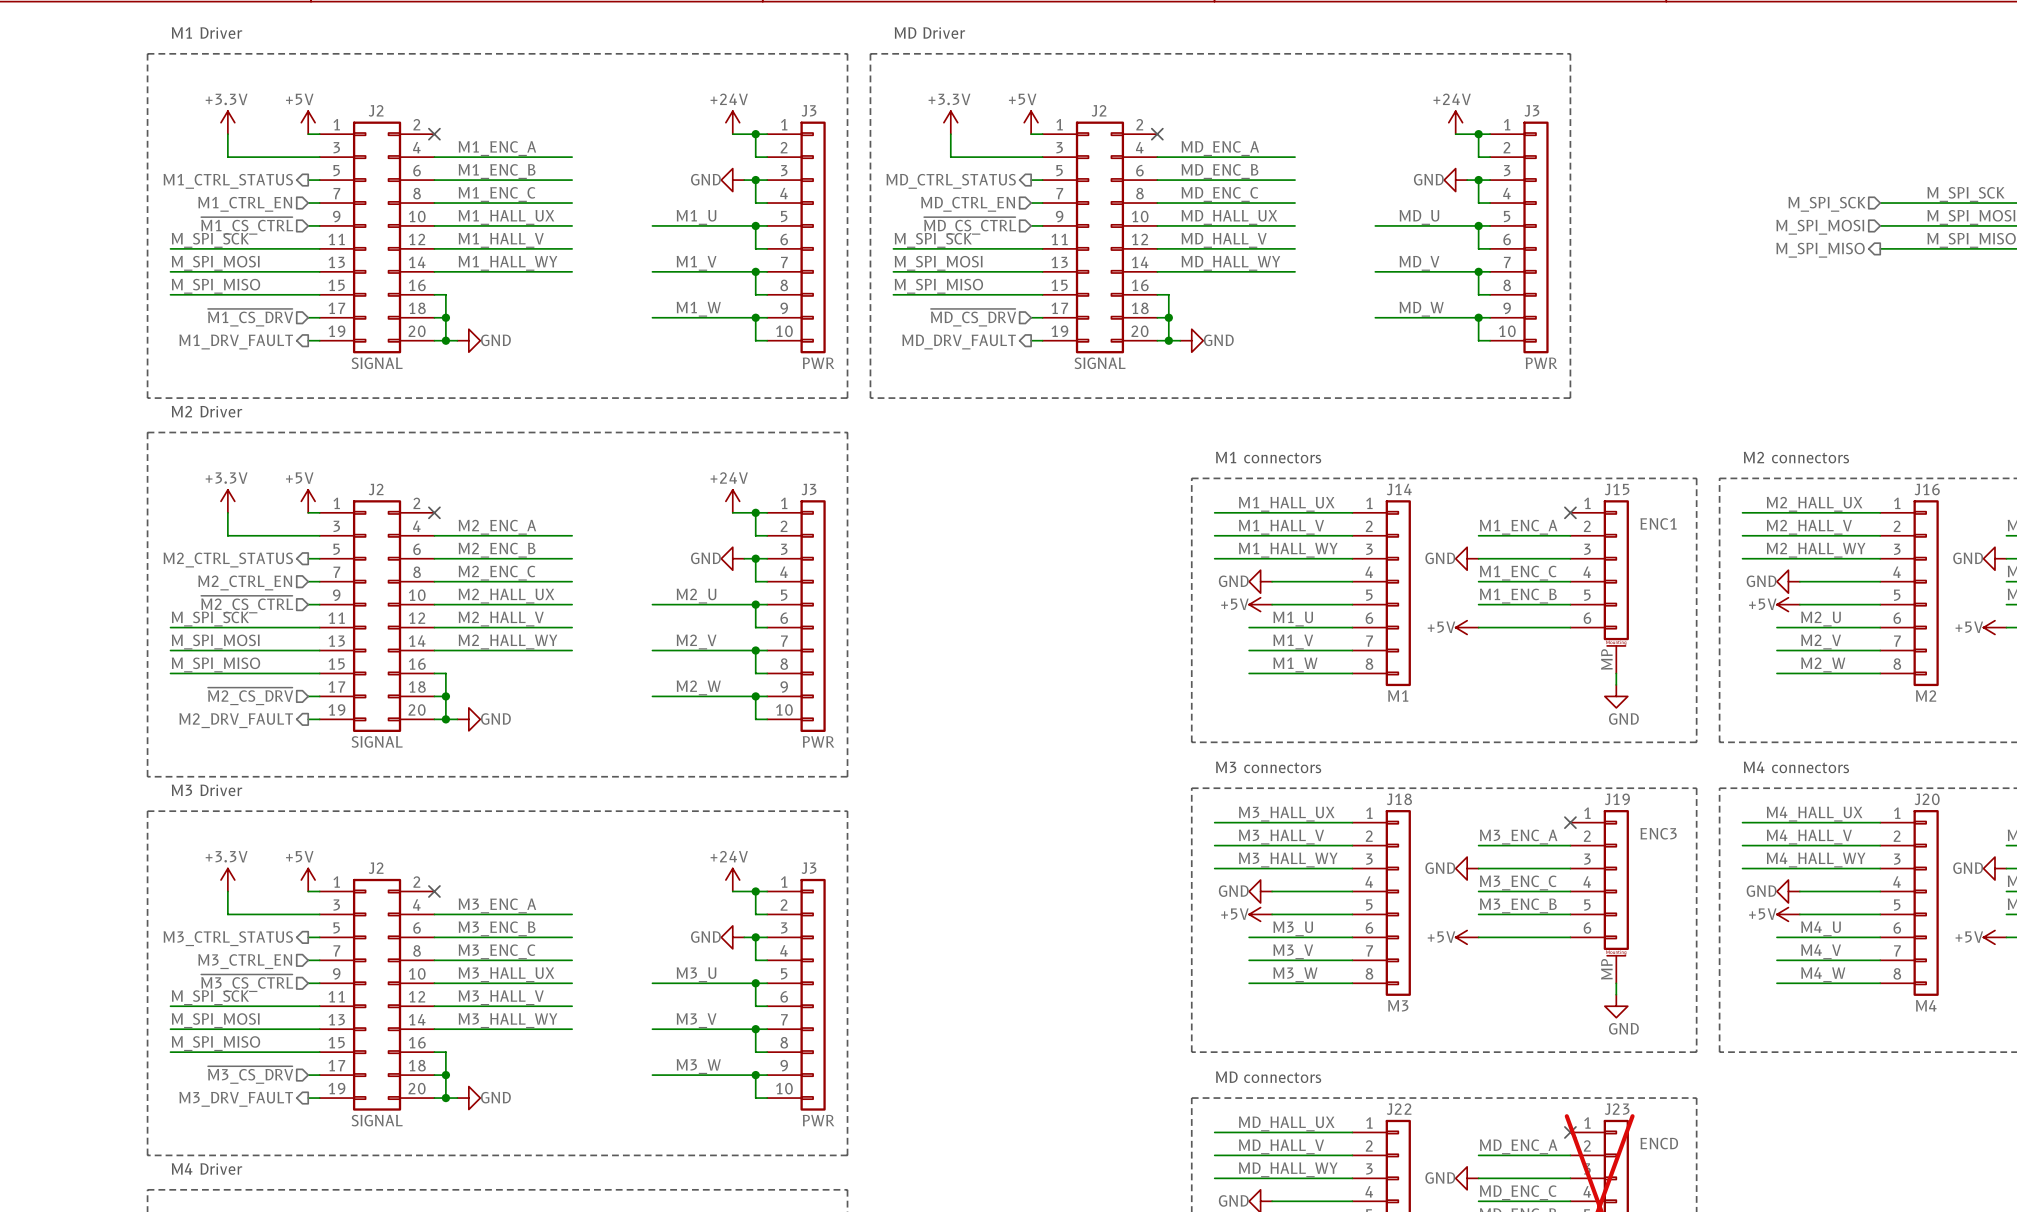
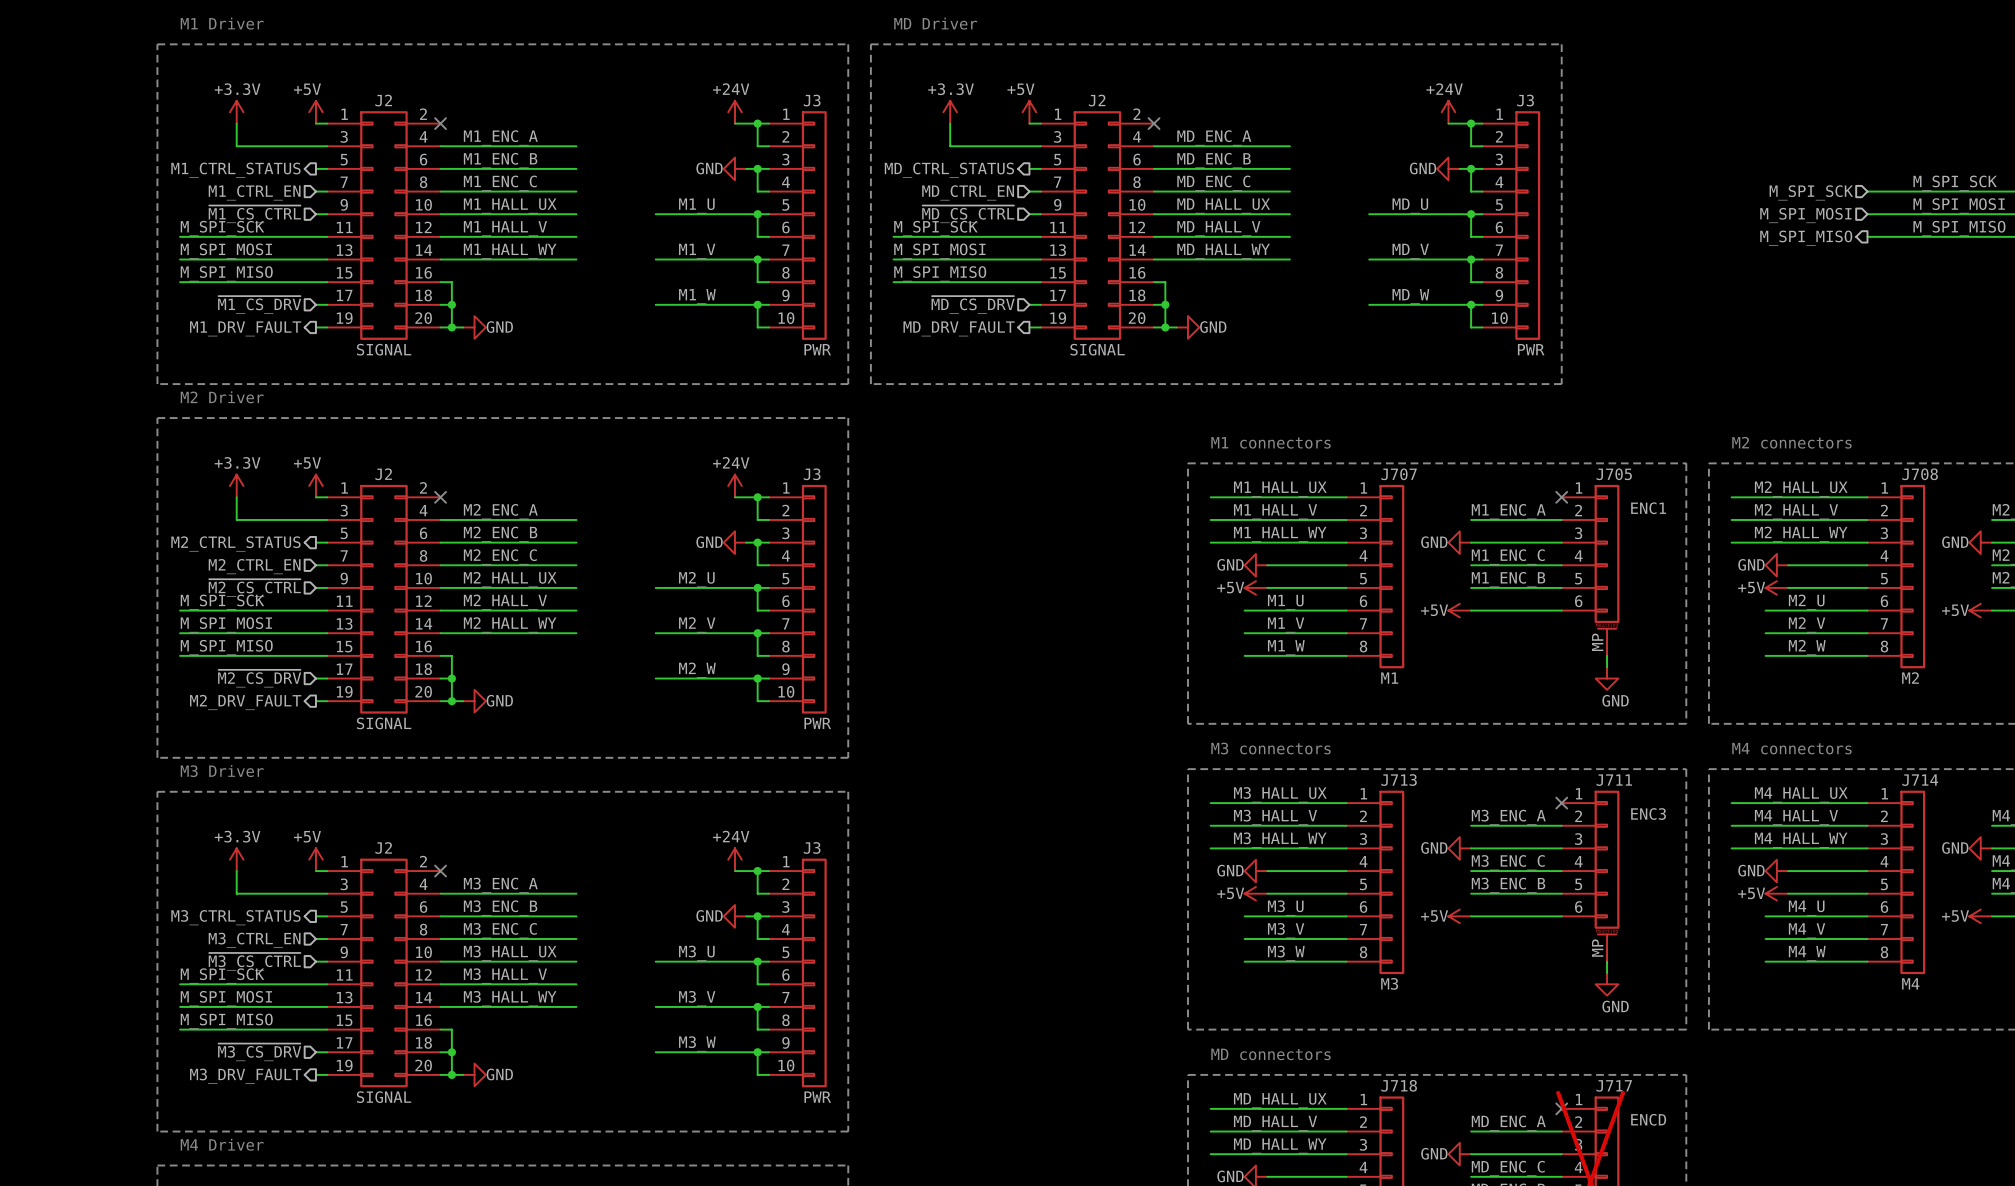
J14 name: J14 (1399, 489) -> J707 (1399, 474)
J15 name: J15 (1617, 489) -> J705 (1614, 474)
J16 name: J16 (1927, 489) -> J708 (1920, 474)
J18 name: J18 (1399, 799) -> J713 (1399, 780)
J19 name: J19 (1617, 799) -> J711 (1614, 780)
J20 name: J20 (1927, 799) -> J714 (1920, 780)
J22 name: J22 (1399, 1109) -> J718 (1399, 1085)
J23 name: J23 (1617, 1109) -> J717 (1614, 1085)

